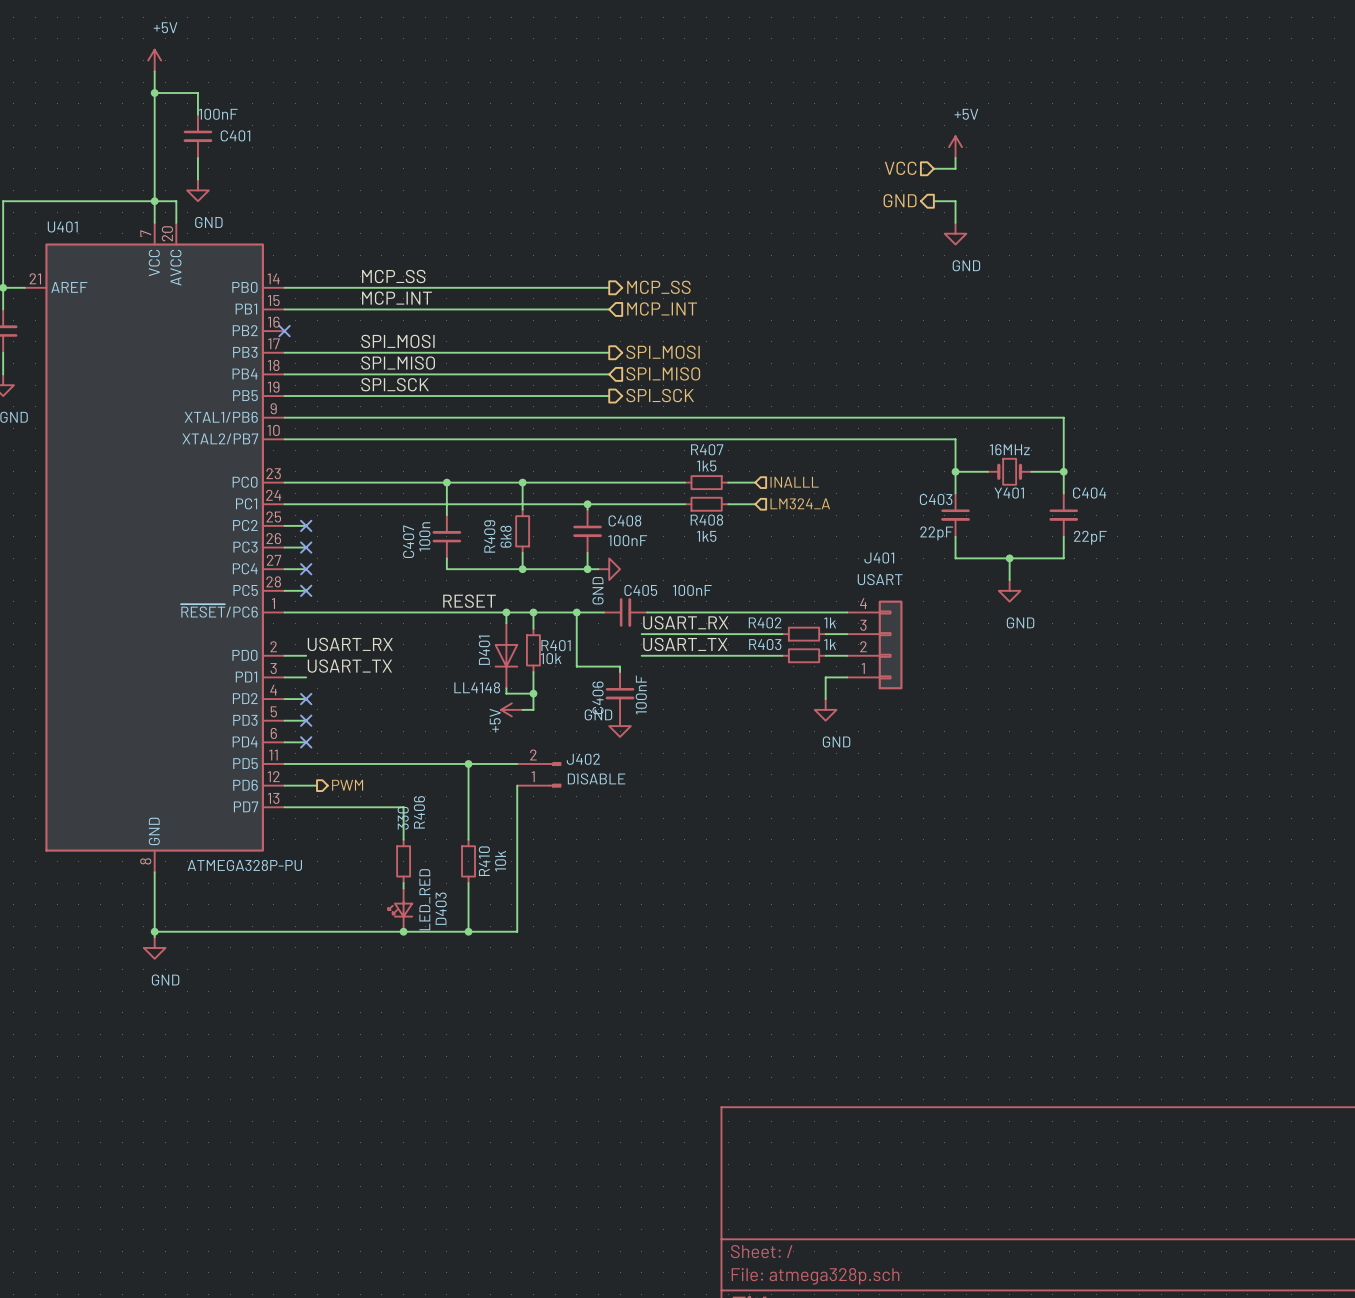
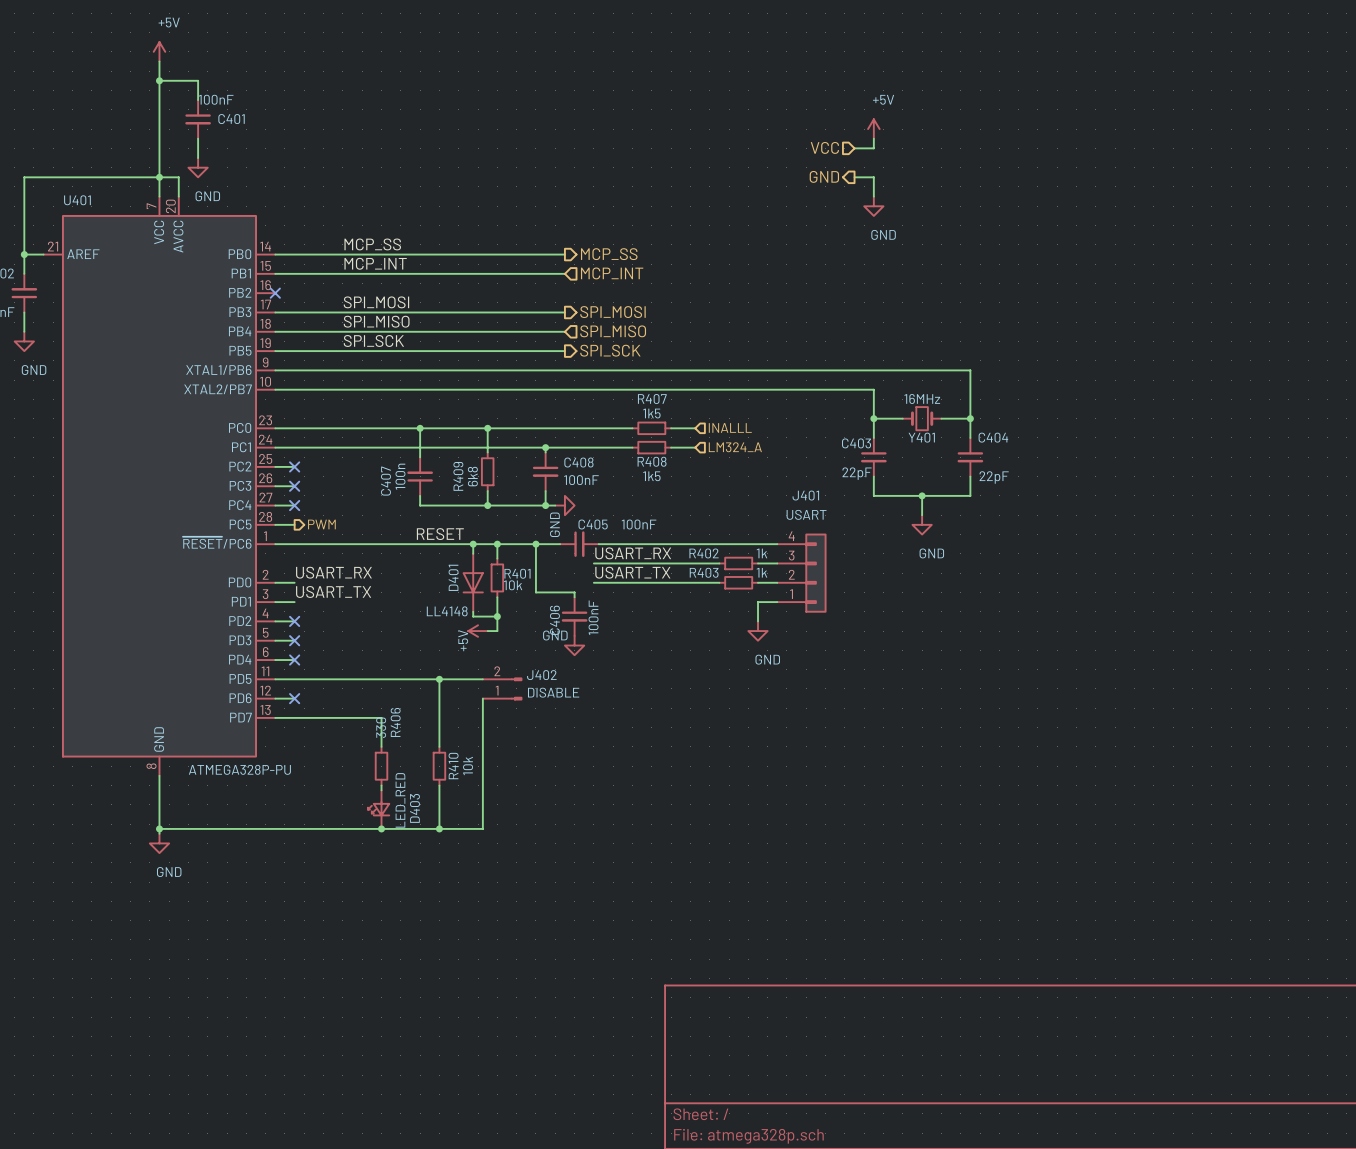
no-connect mark: (306, 590) -> none
wire: (306, 785) (317, 785) -> none
no-connect mark: none -> (294, 698)
hierarchical label position: PWM (347, 785) -> PWM (321, 524)

